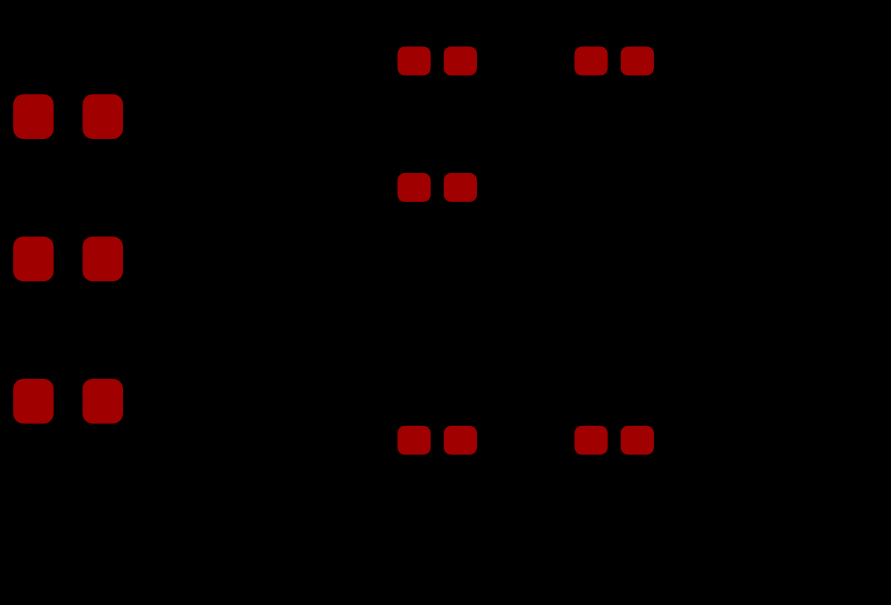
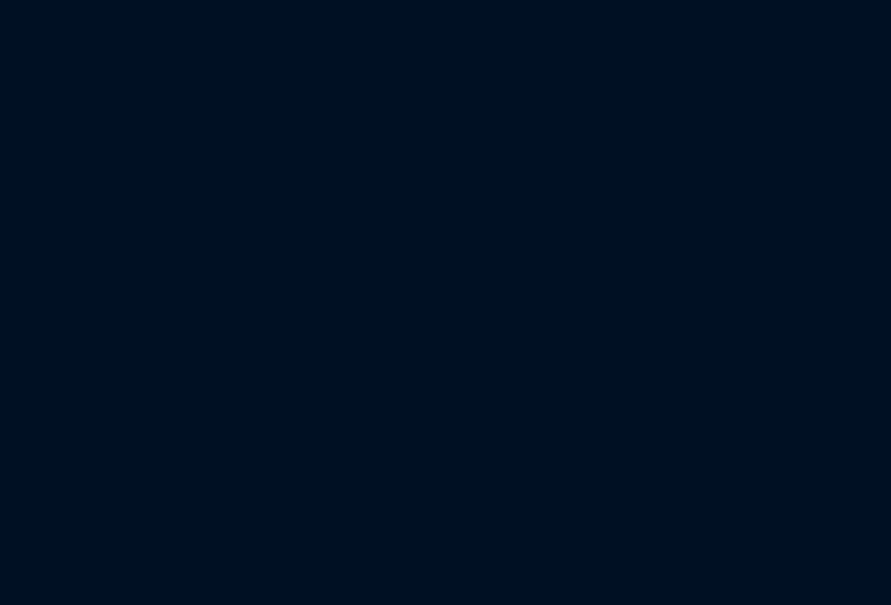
part: (437, 61) -> none
part: (614, 61) -> none
part: (68, 116) -> none
part: (437, 187) -> none
part: (68, 258) -> none
part: (68, 401) -> none
part: (437, 440) -> none
part: (614, 440) -> none

